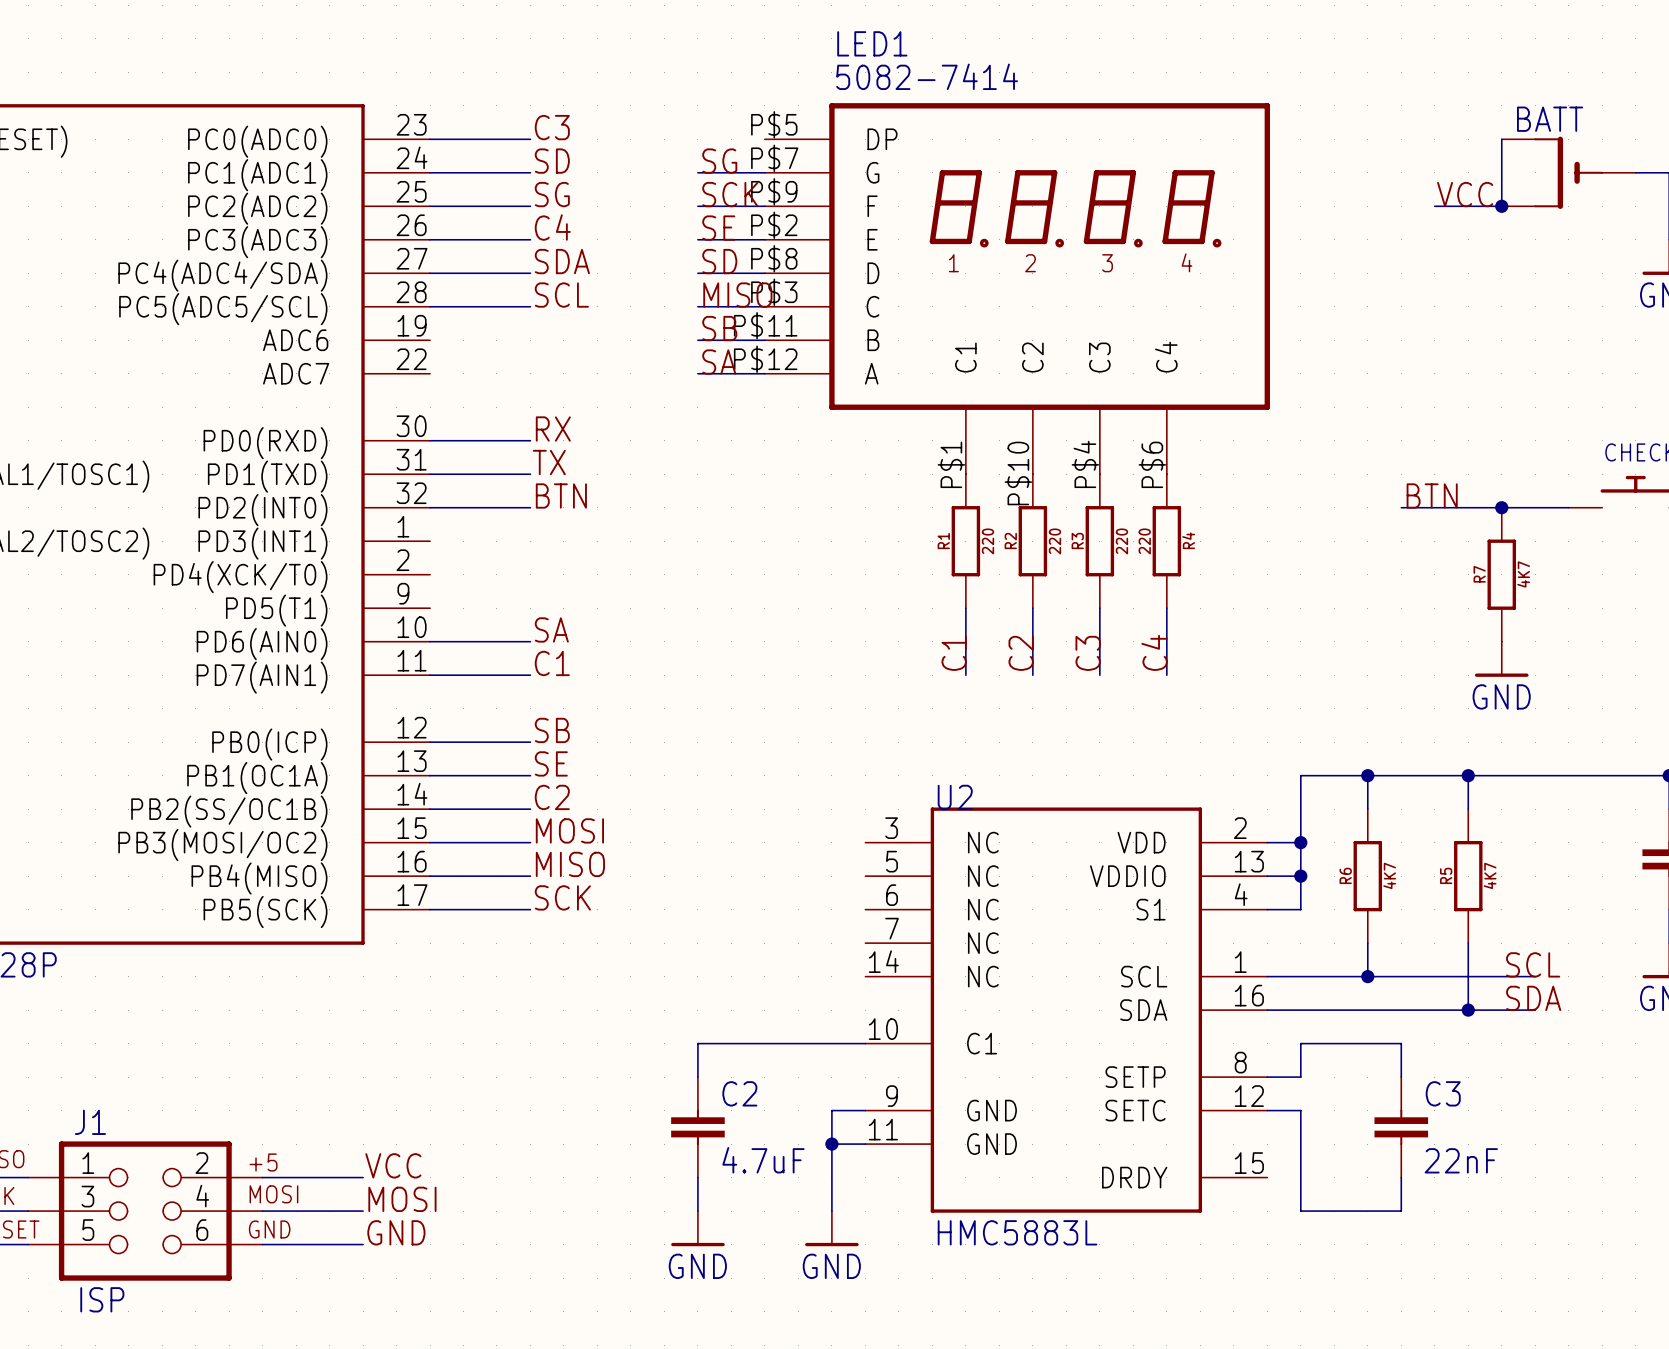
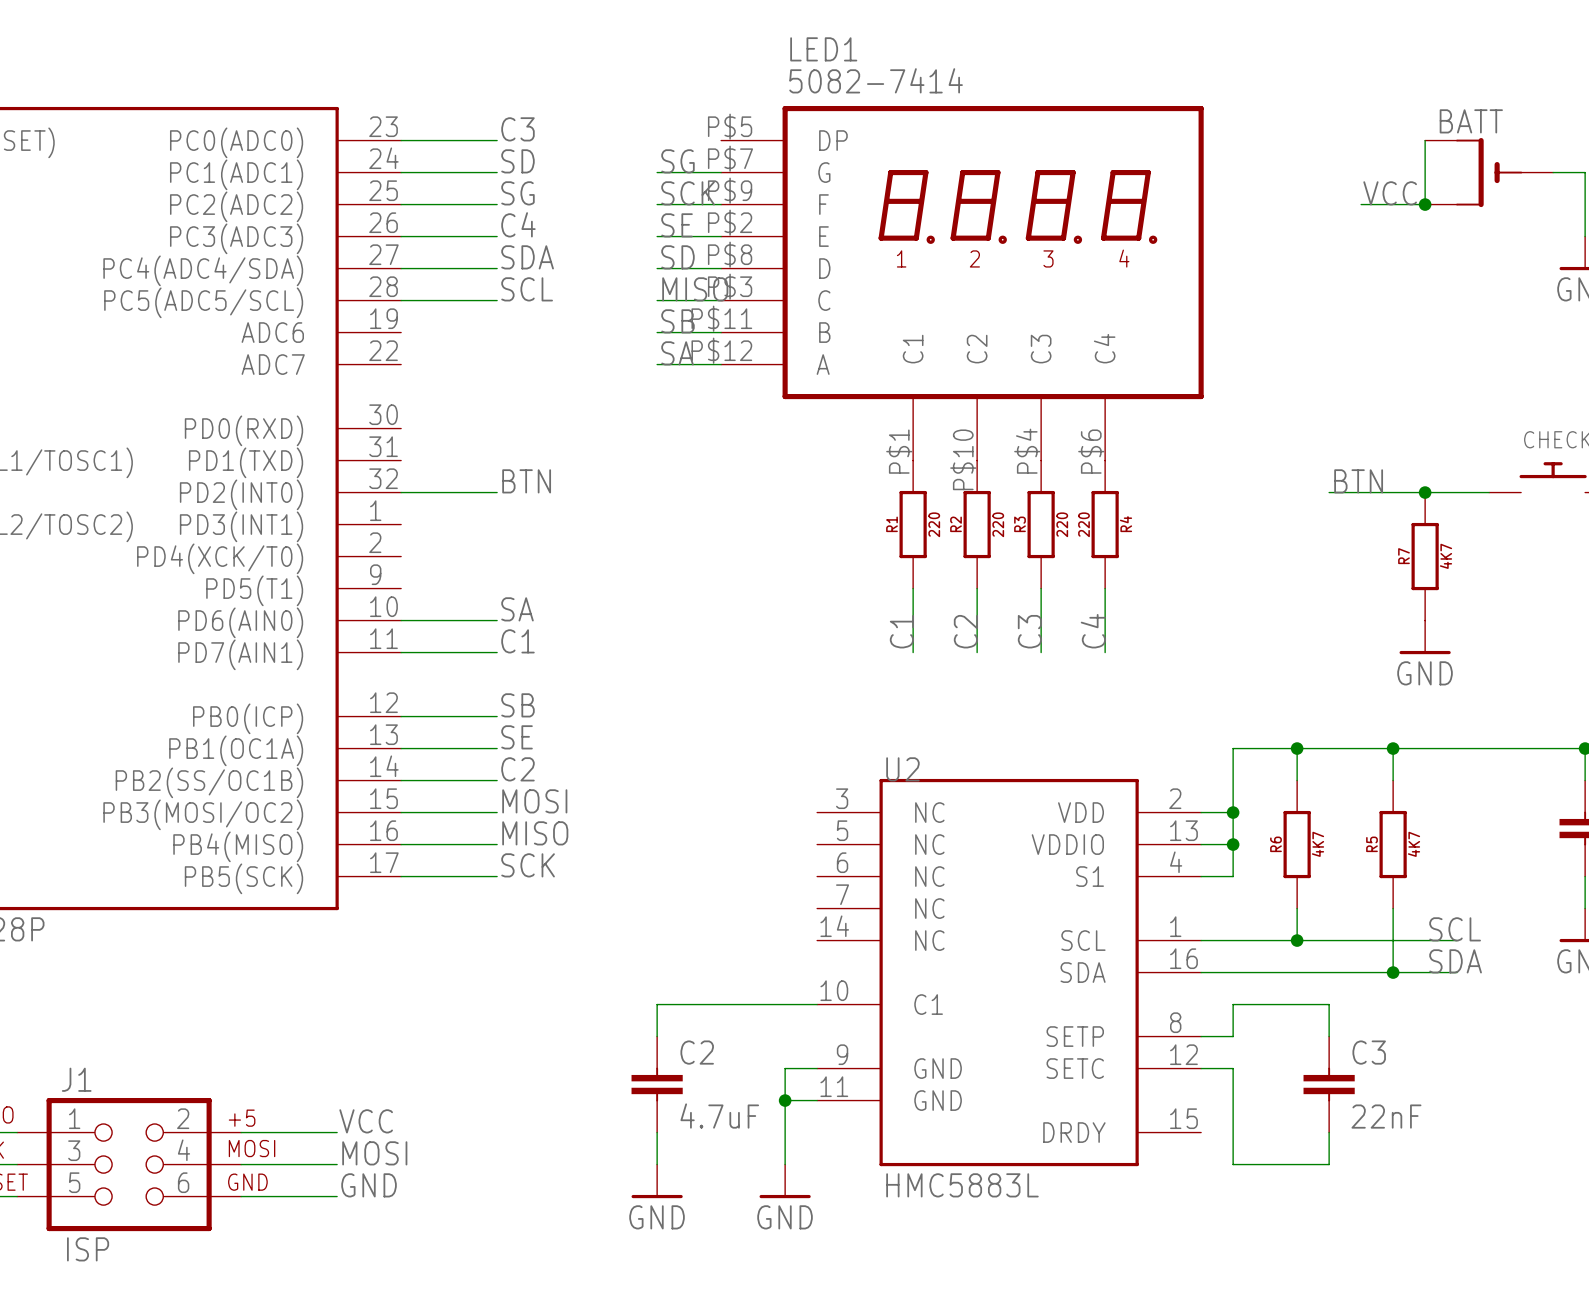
label: RX (553, 429) -> none
wire: (430, 440) (530, 440) -> none
label: TX (549, 462) -> none
wire: (430, 474) (530, 474) -> none

